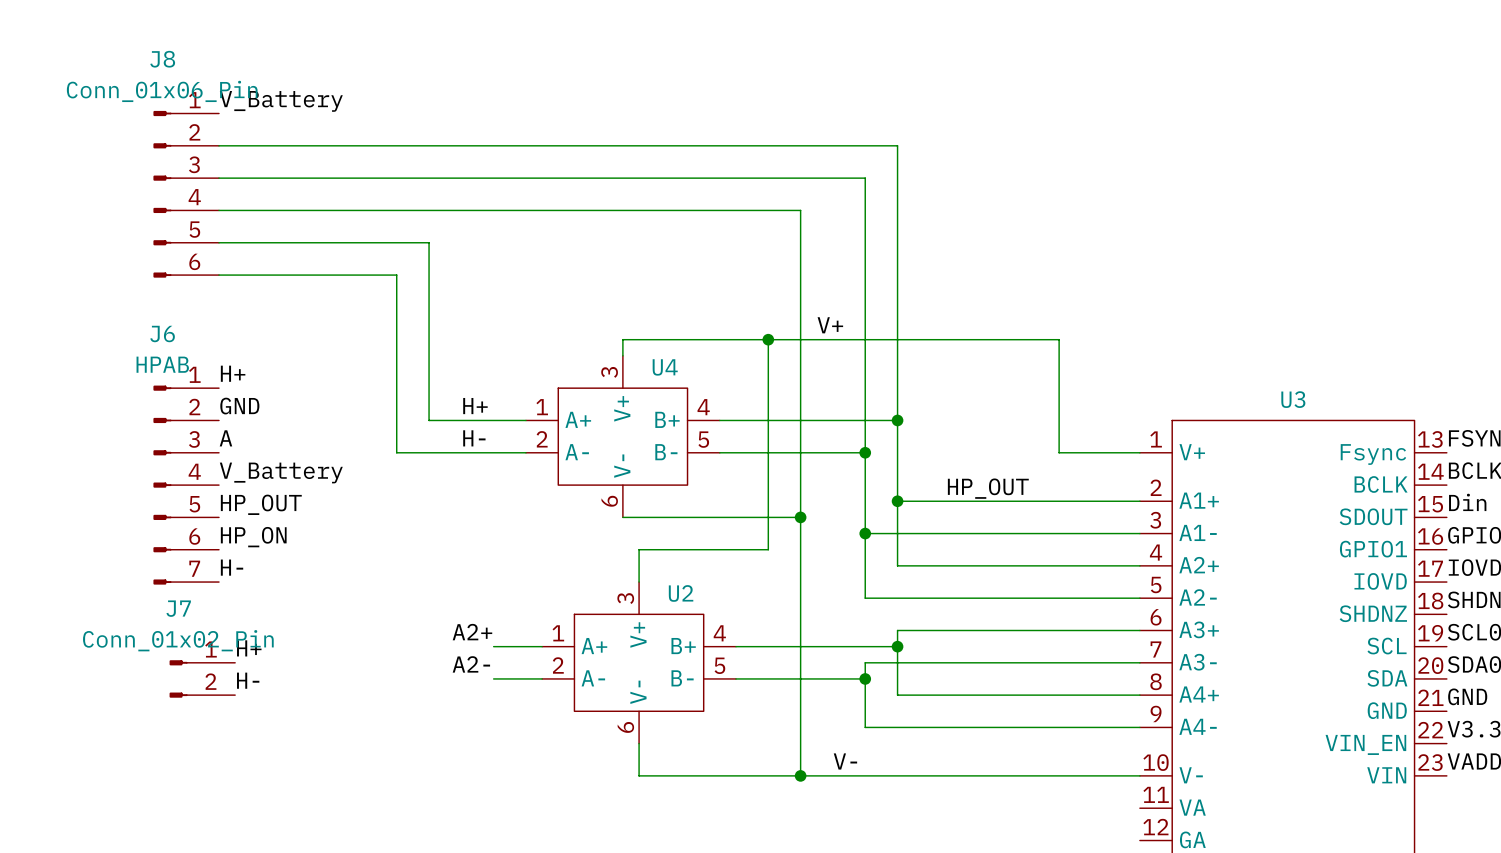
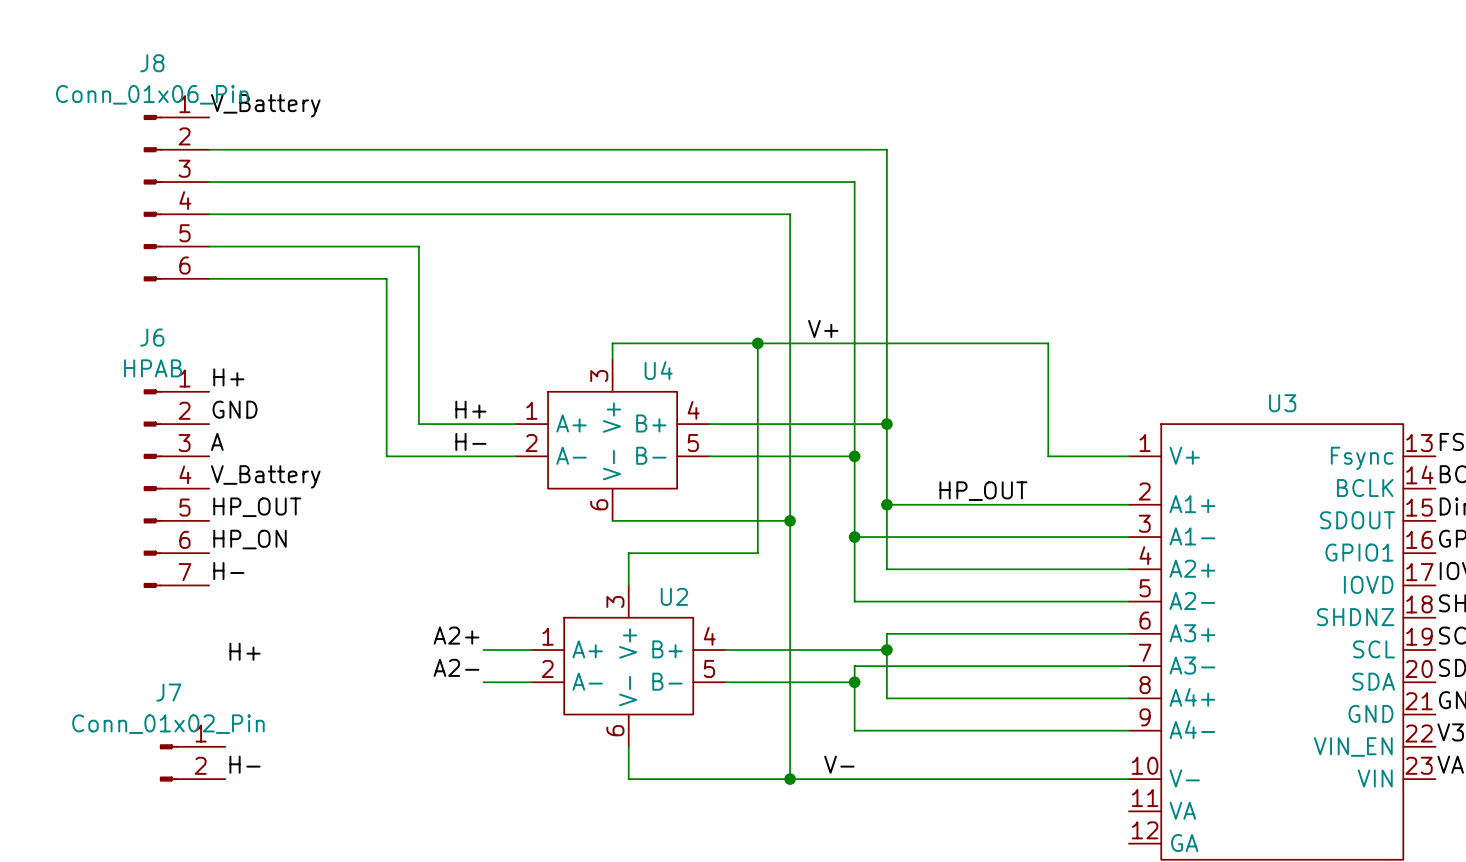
J7 position: (202, 678) -> (192, 762)
label position: H- (248, 680) -> H- (245, 764)

